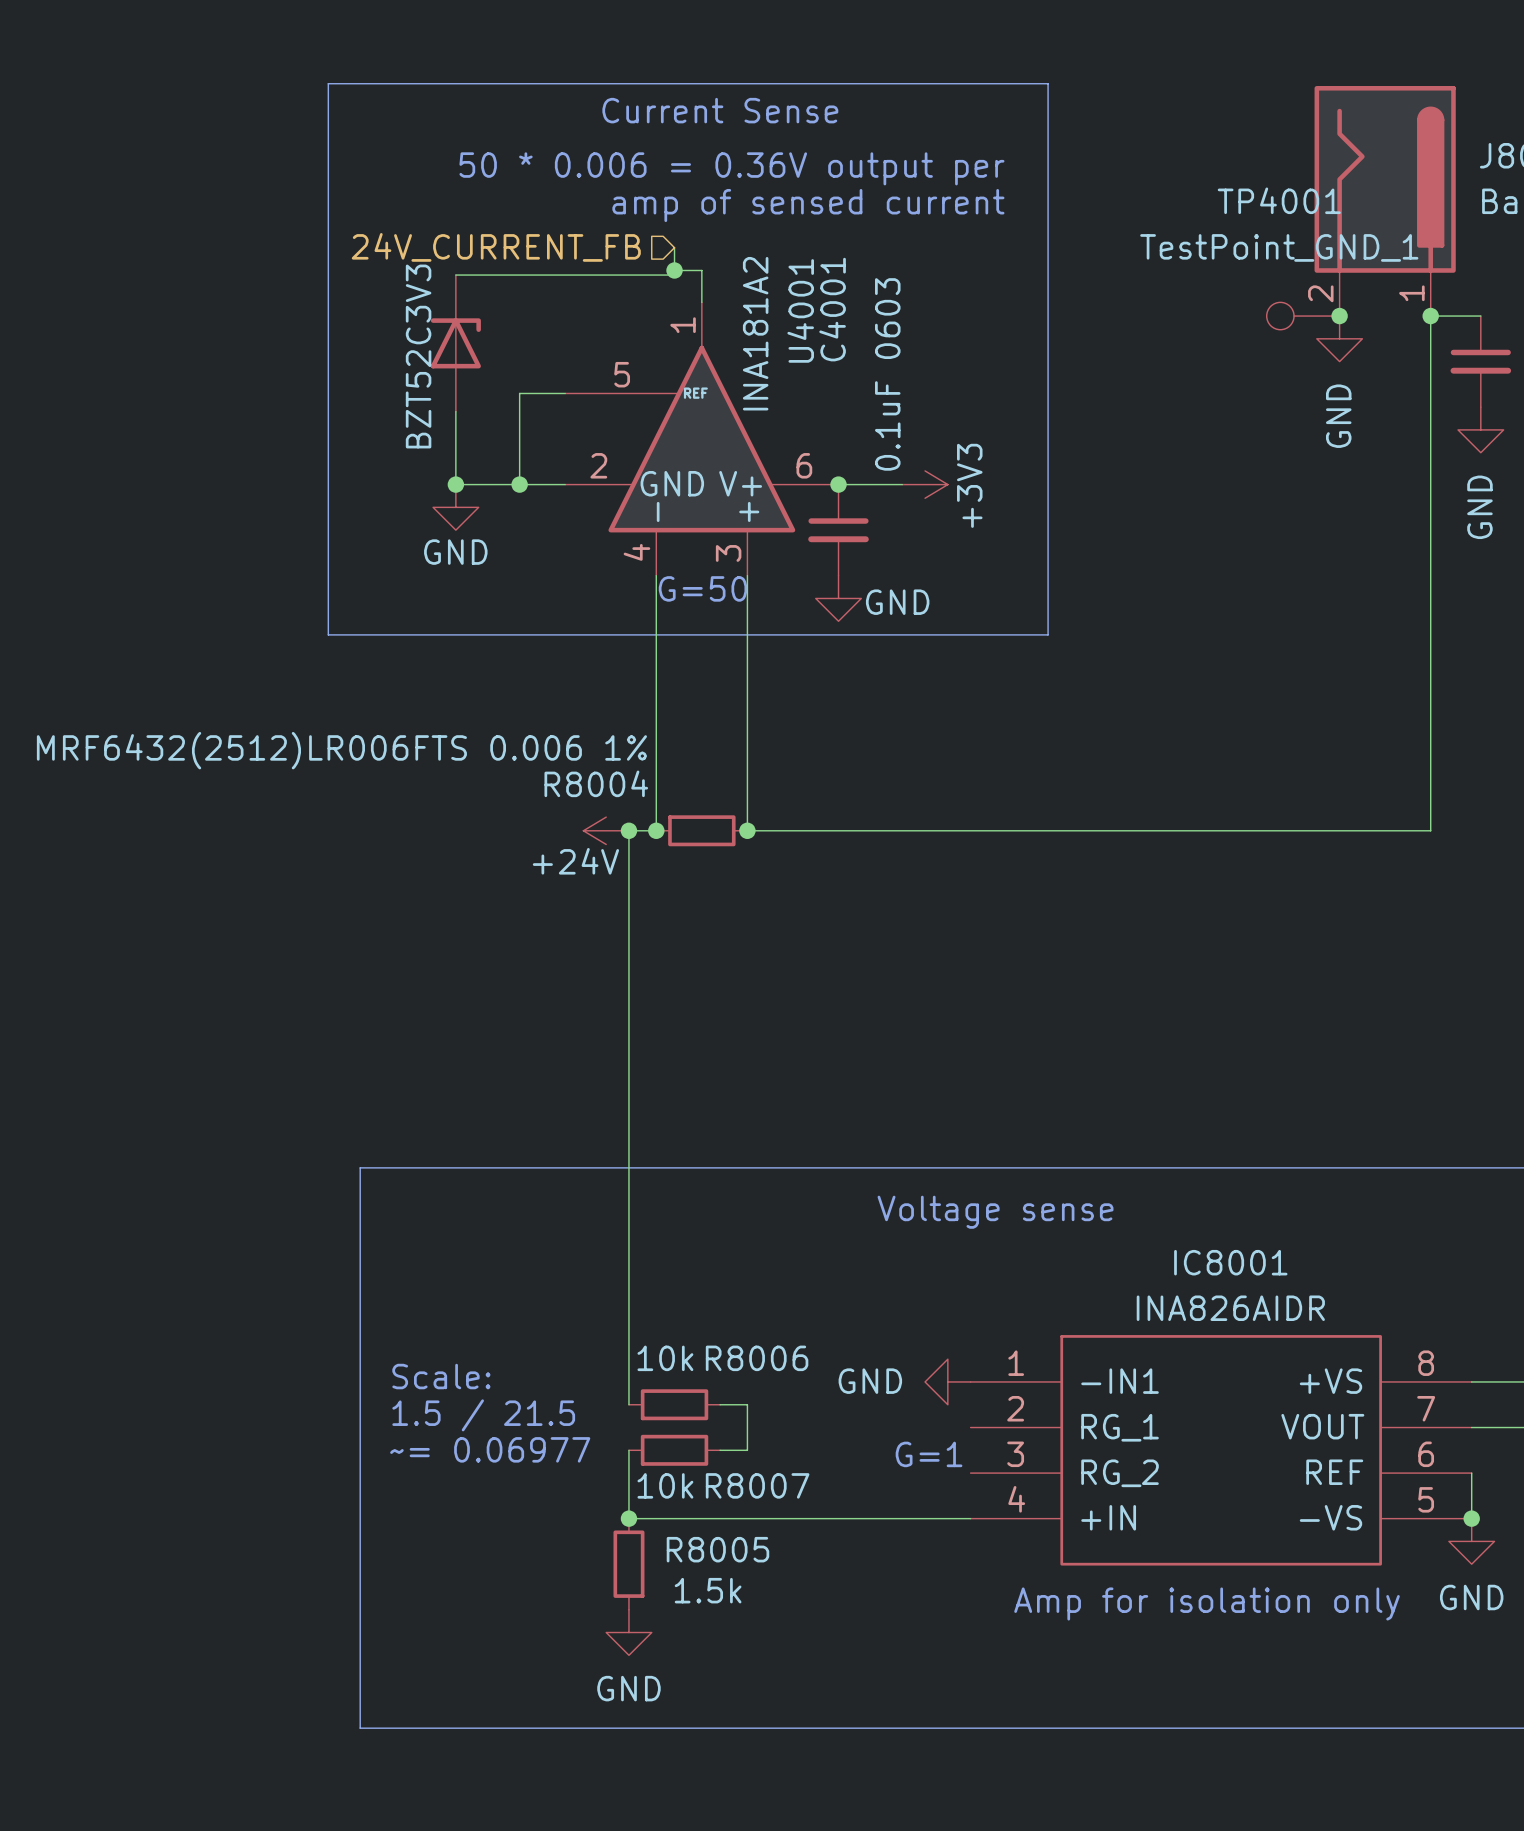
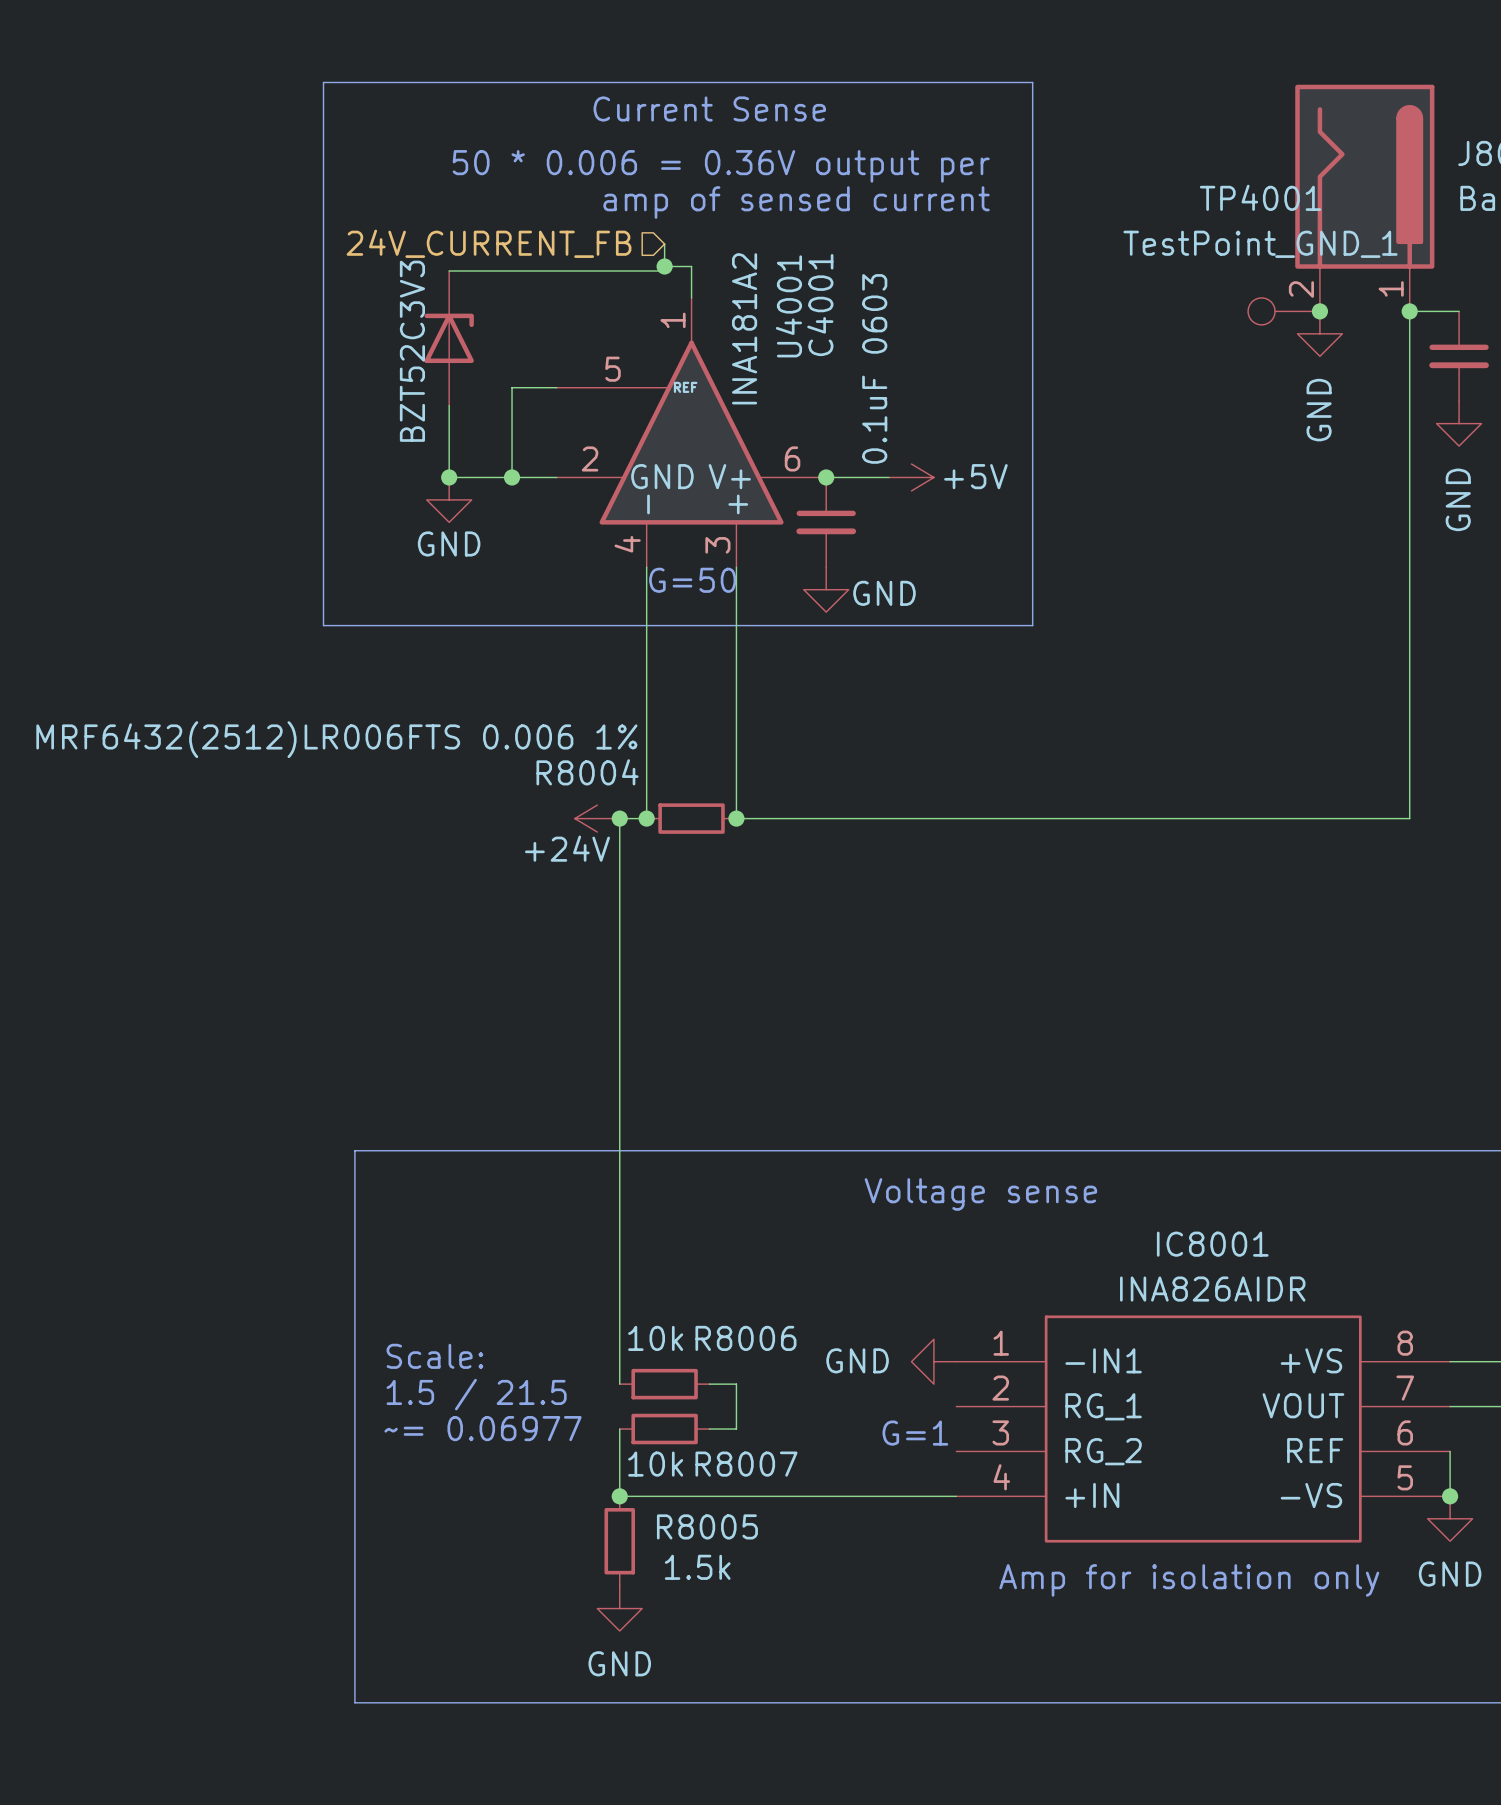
power symbol: +3V3 (925, 484) -> +5V (911, 477)

